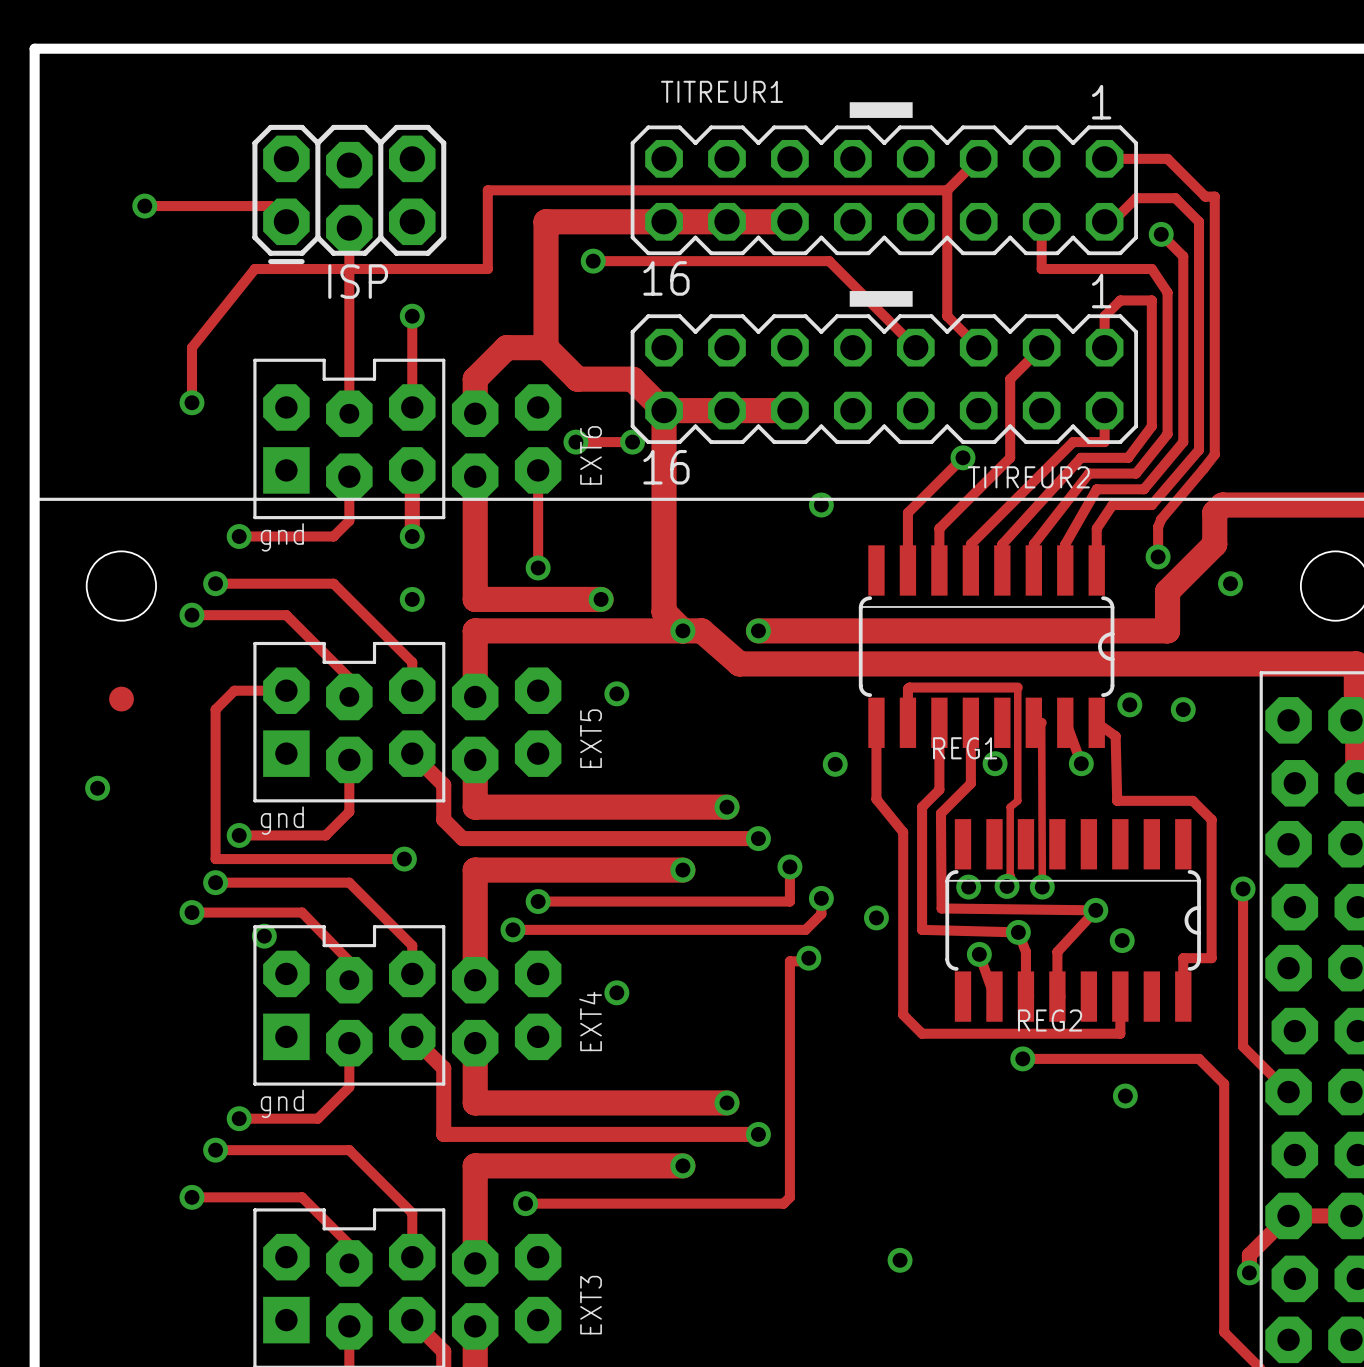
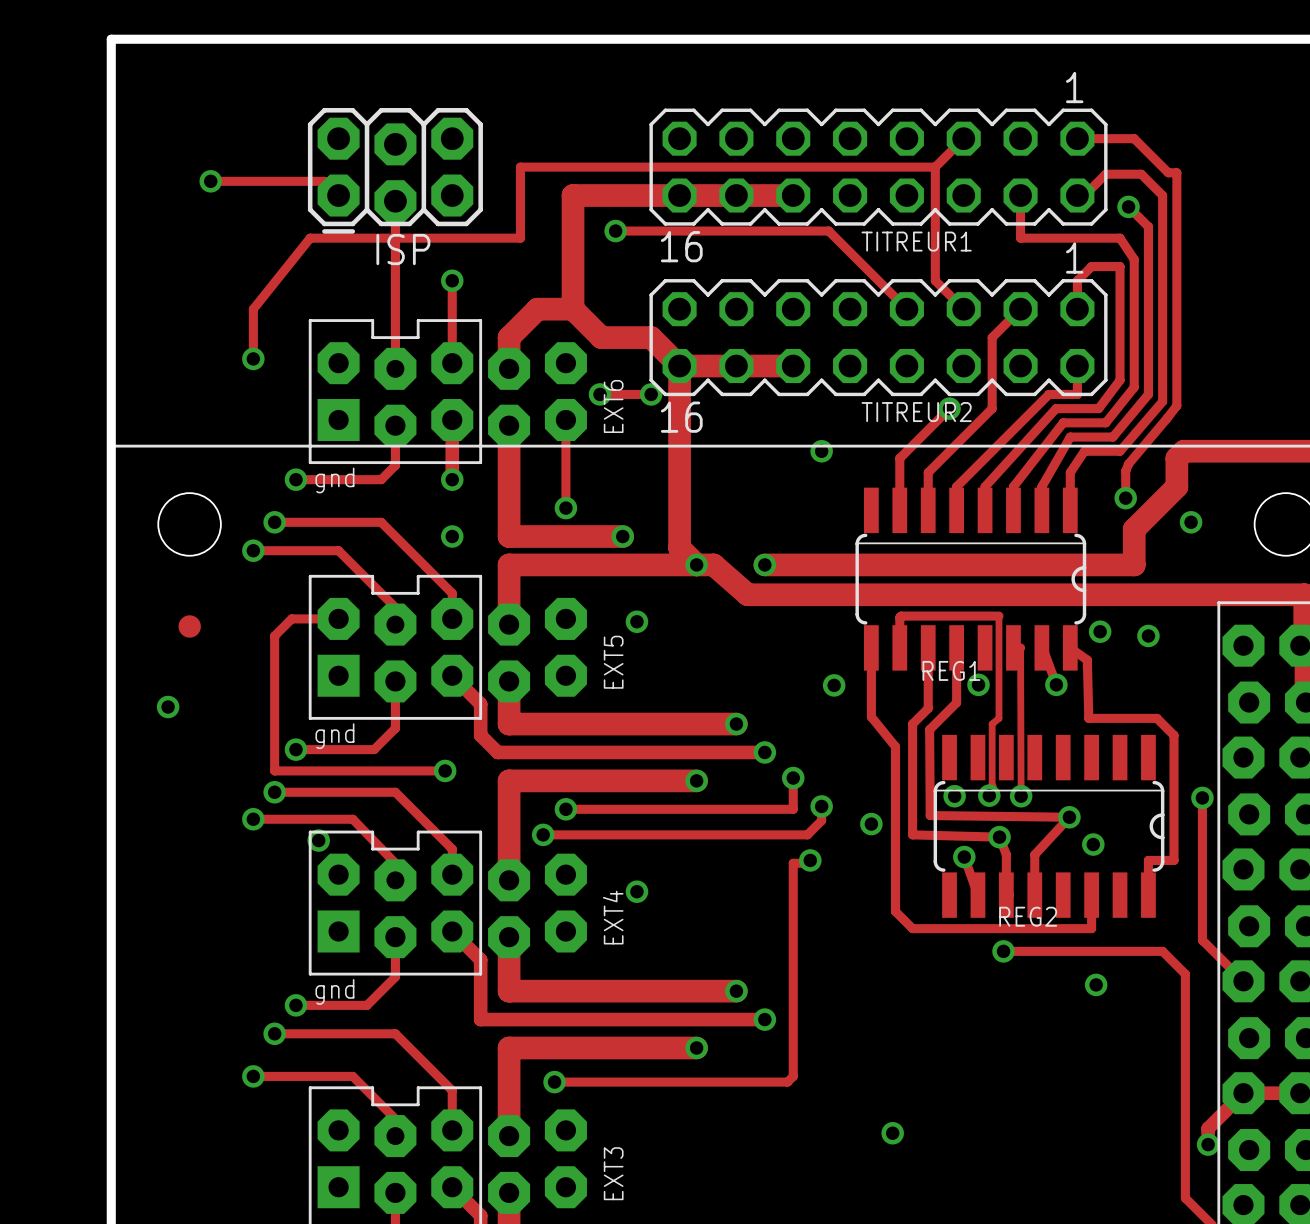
TITREUR1 name position: TITREUR1 (722, 91) -> TITREUR1 (916, 241)
TITREUR1 footprint: [630, 102, 1138, 256] -> [649, 108, 1108, 226]
TITREUR2 footprint: [630, 291, 1138, 444] -> [649, 279, 1108, 397]
TITREUR2 name position: TITREUR2 (1028, 477) -> TITREUR2 (916, 412)

